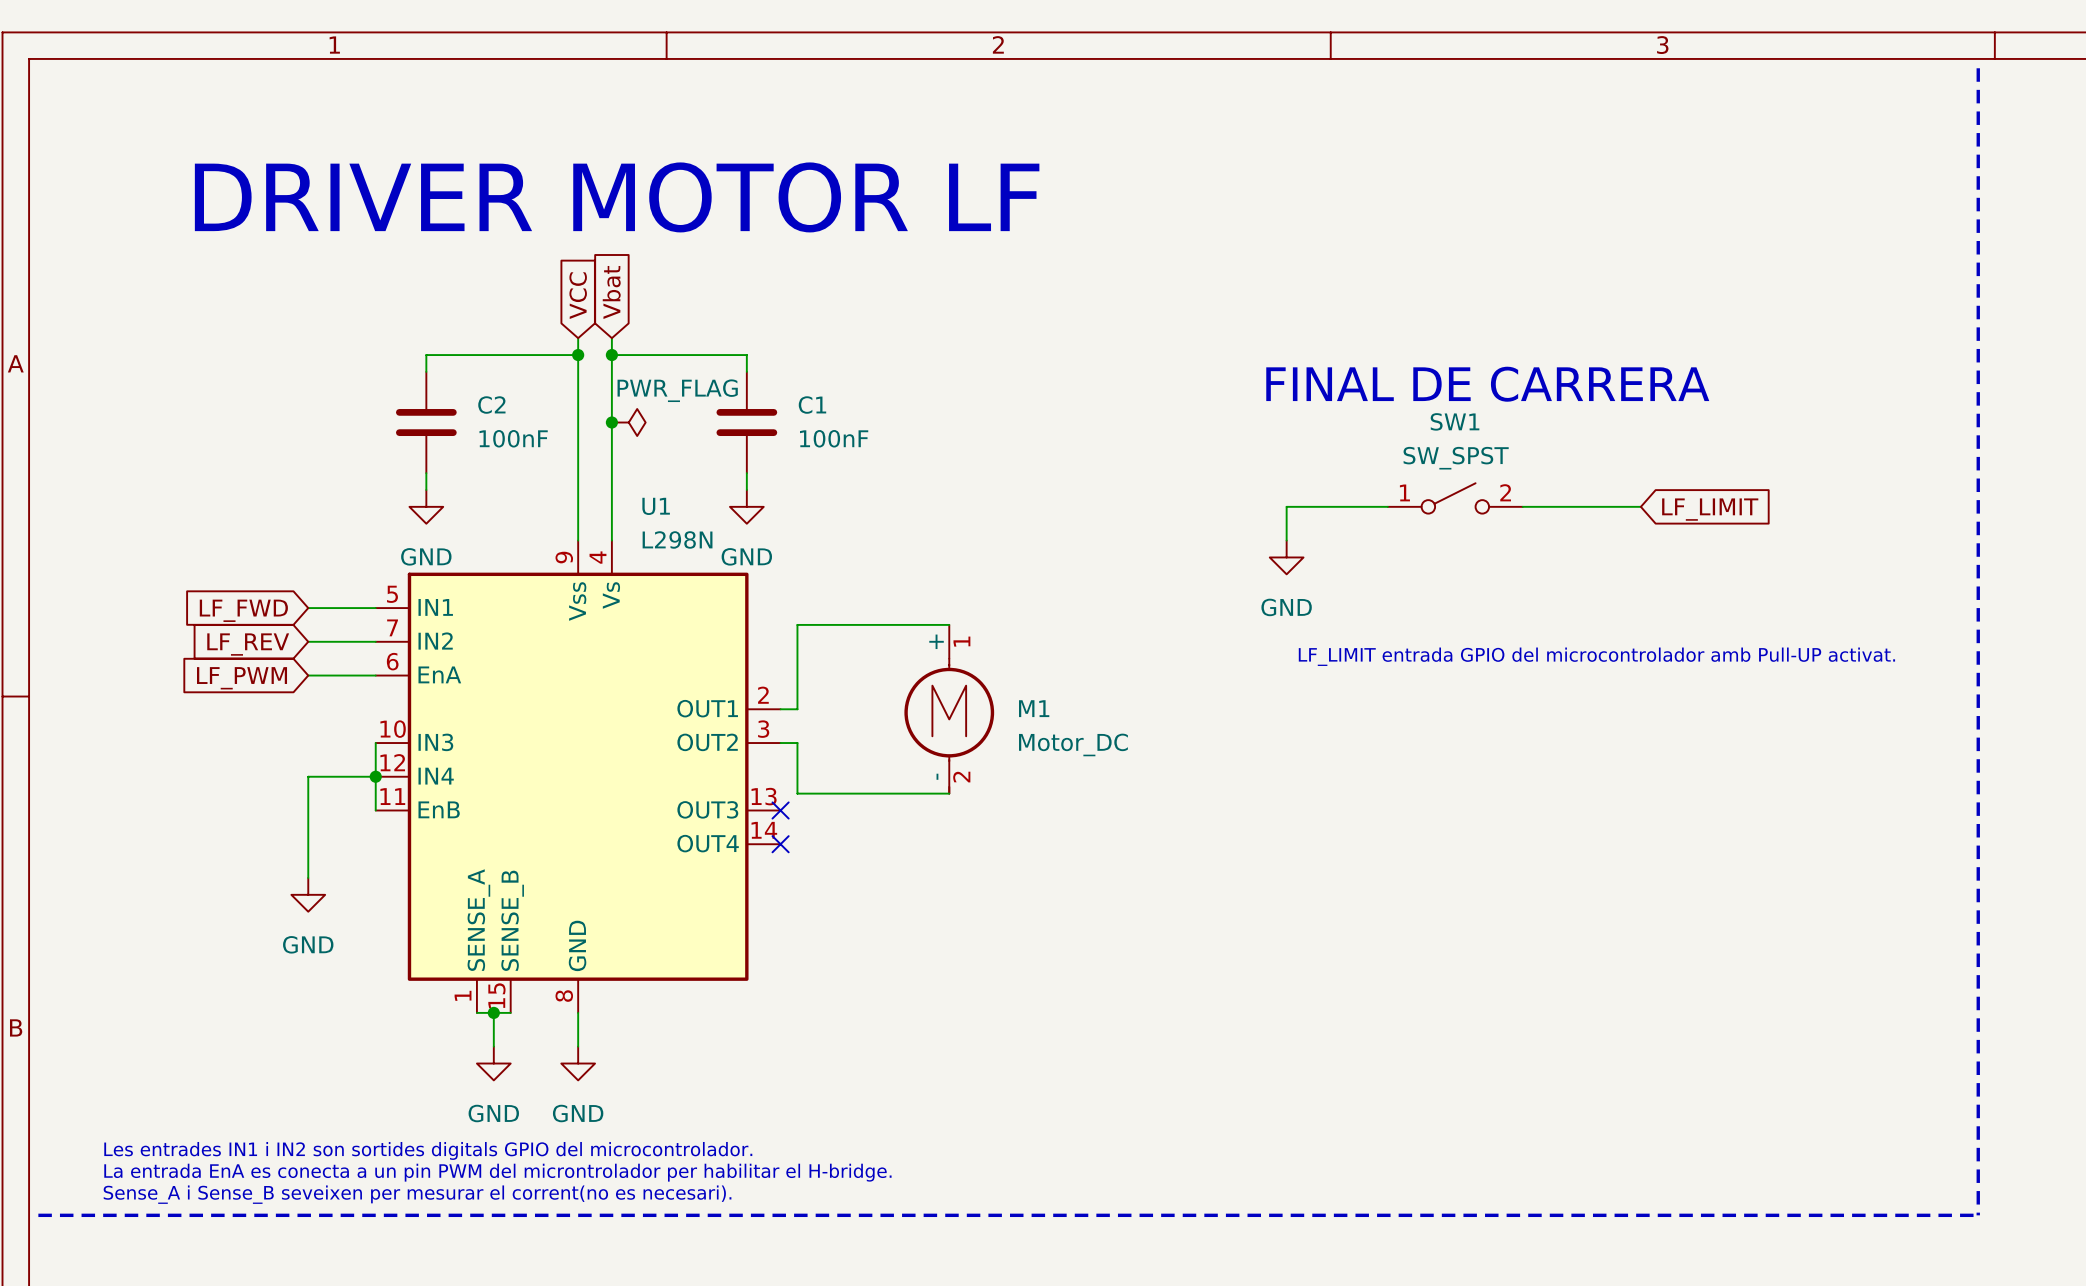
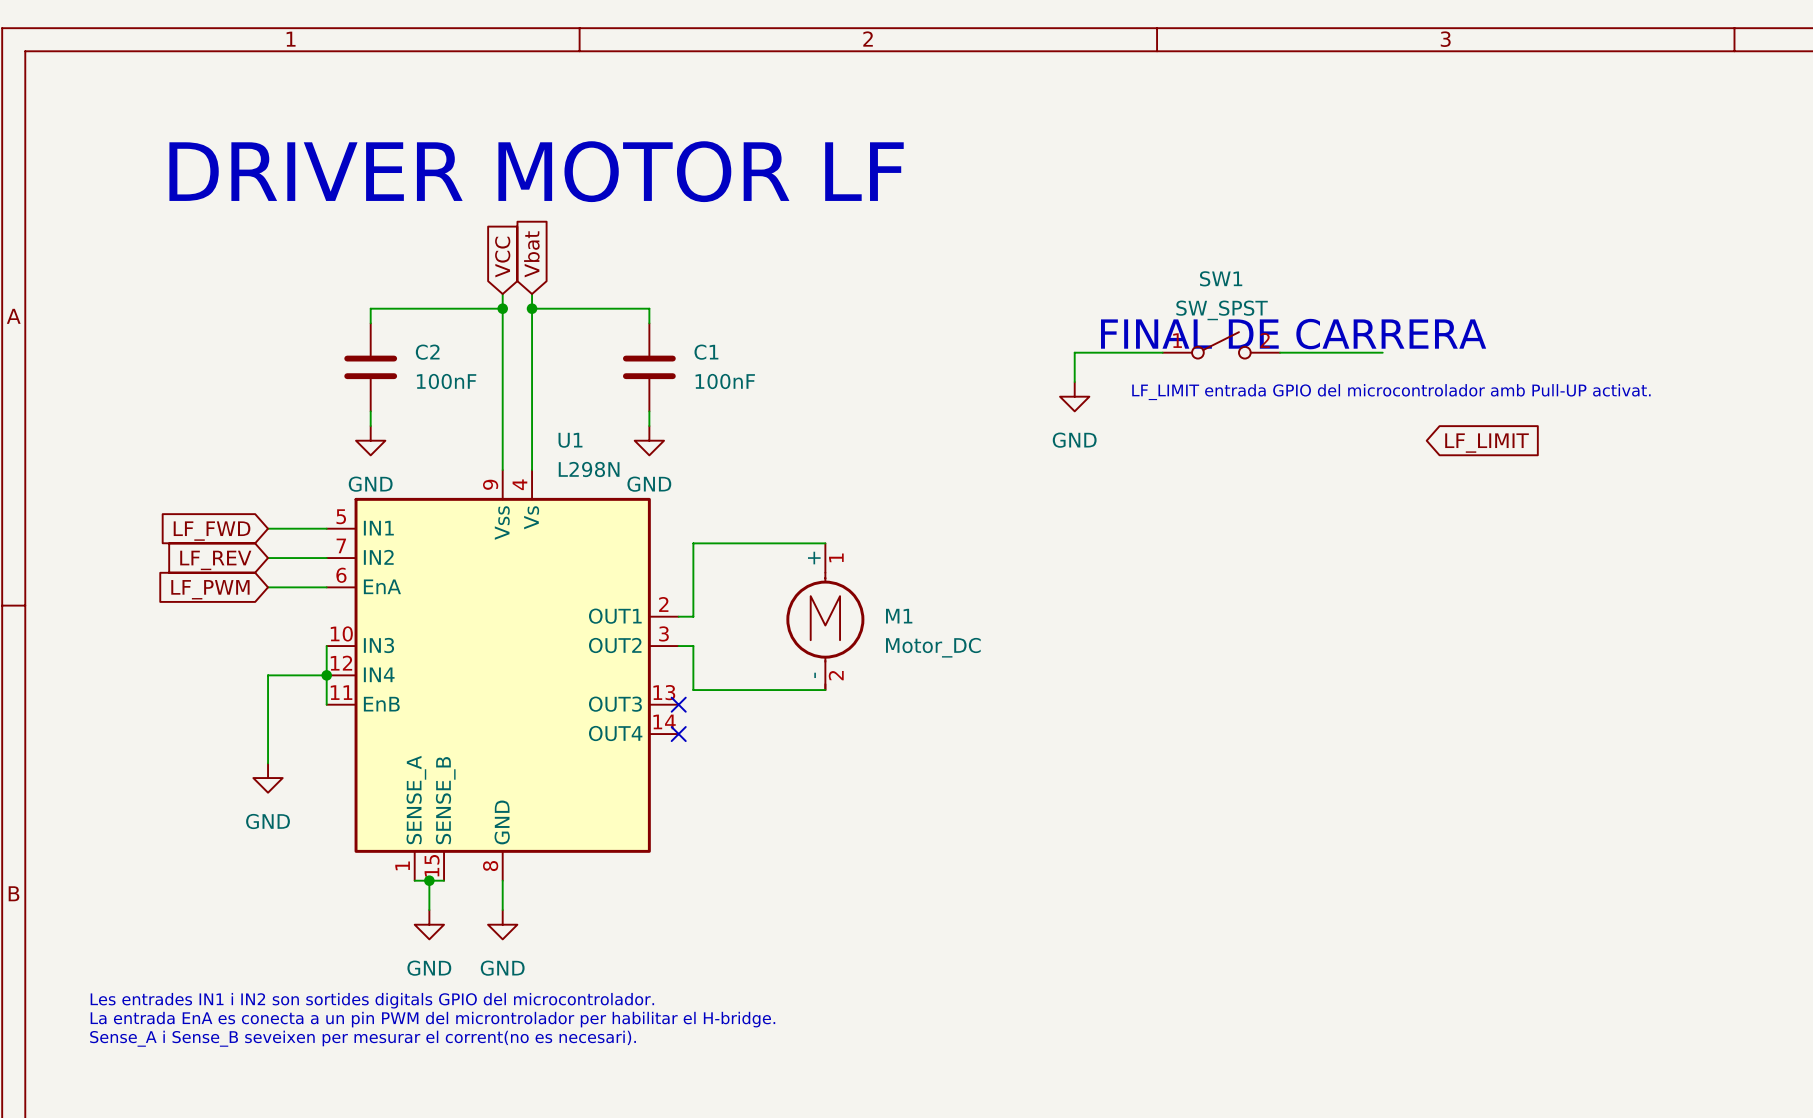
line: (1978, 68) (1978, 1215) (38, 1215) -> none
junction: (611, 422) -> none
power symbol: PWR_FLAG (628, 422) -> none
SW1 position: (1455, 498) -> (1221, 345)
wire: (1387, 506) (1286, 506) (1286, 540) -> (1162, 352) (1074, 352) (1074, 382)
wire: (1522, 506) (1640, 506) -> (1280, 352) (1382, 352)
power symbol position: GND (1286, 557) -> GND (1074, 396)
text position: LF_LIMIT entrada GPIO del microcontrolador amb Pull-UP activat. (1596, 656) -> LF_LIMIT entrada GPIO del microcontrolador amb Pull-UP activat. (1391, 392)

